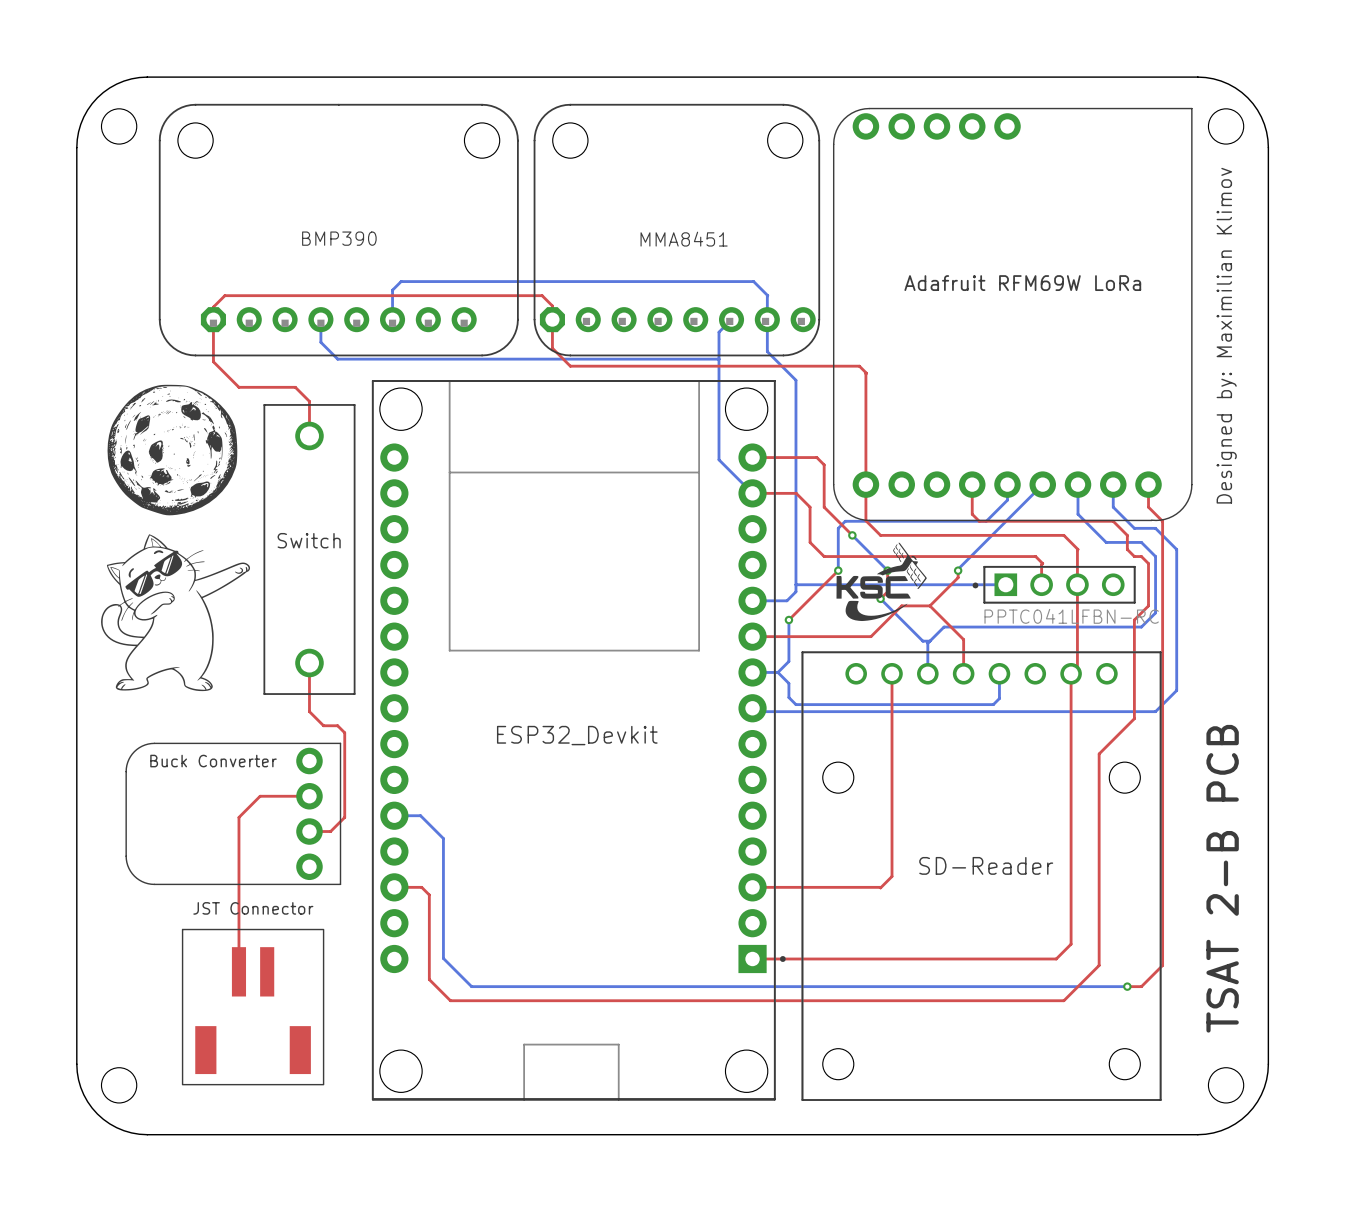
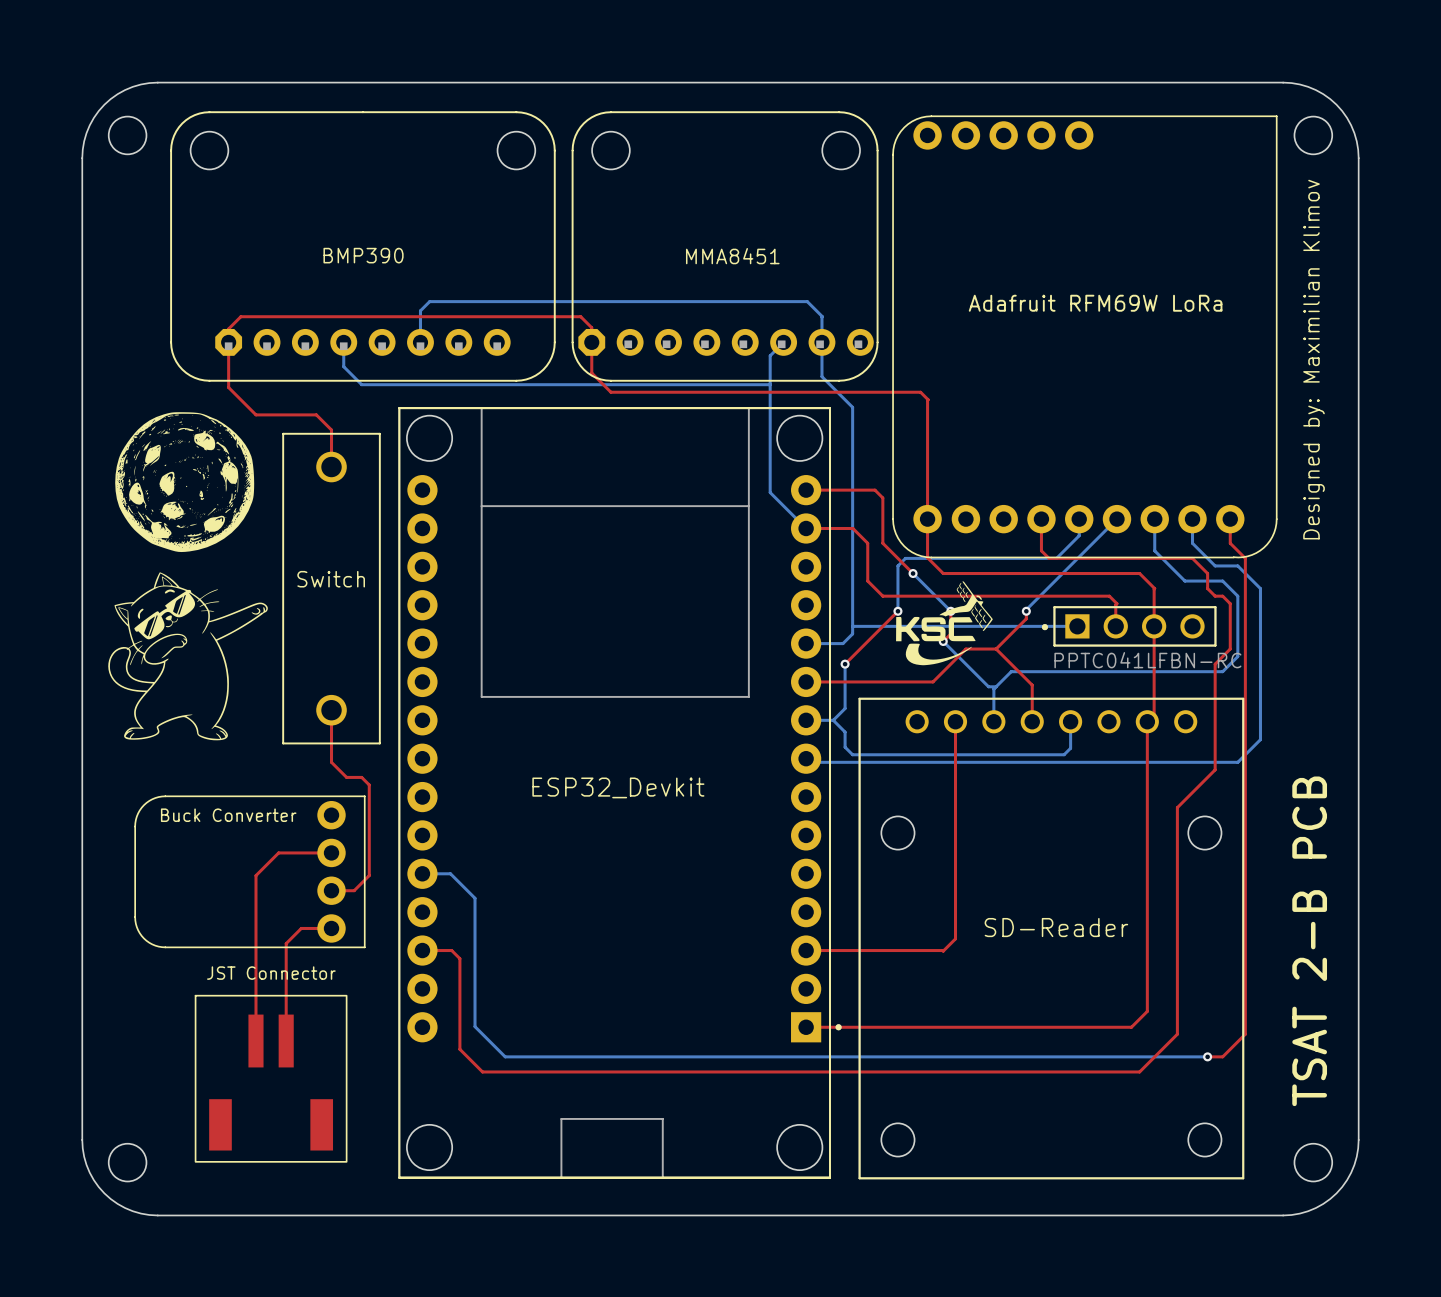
top track: none -> (331, 928) (301, 928) (286, 943) (286, 1041)

